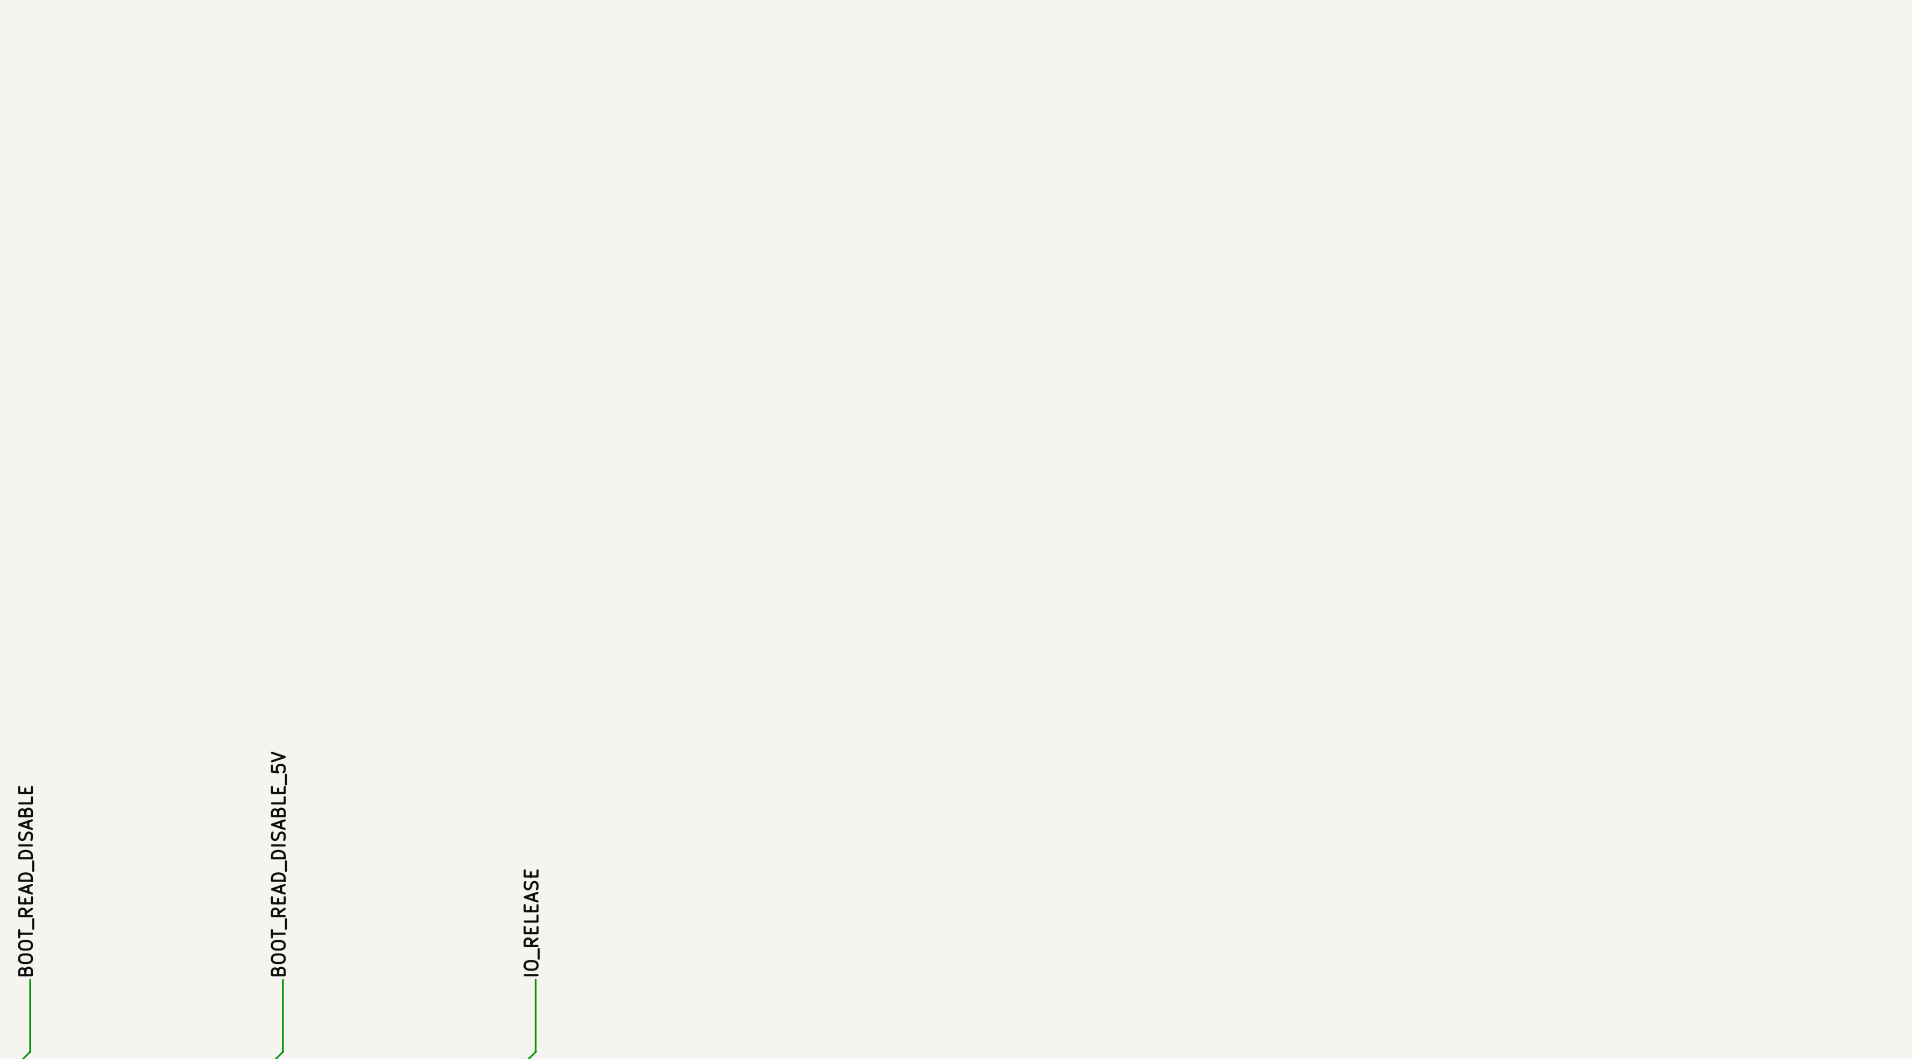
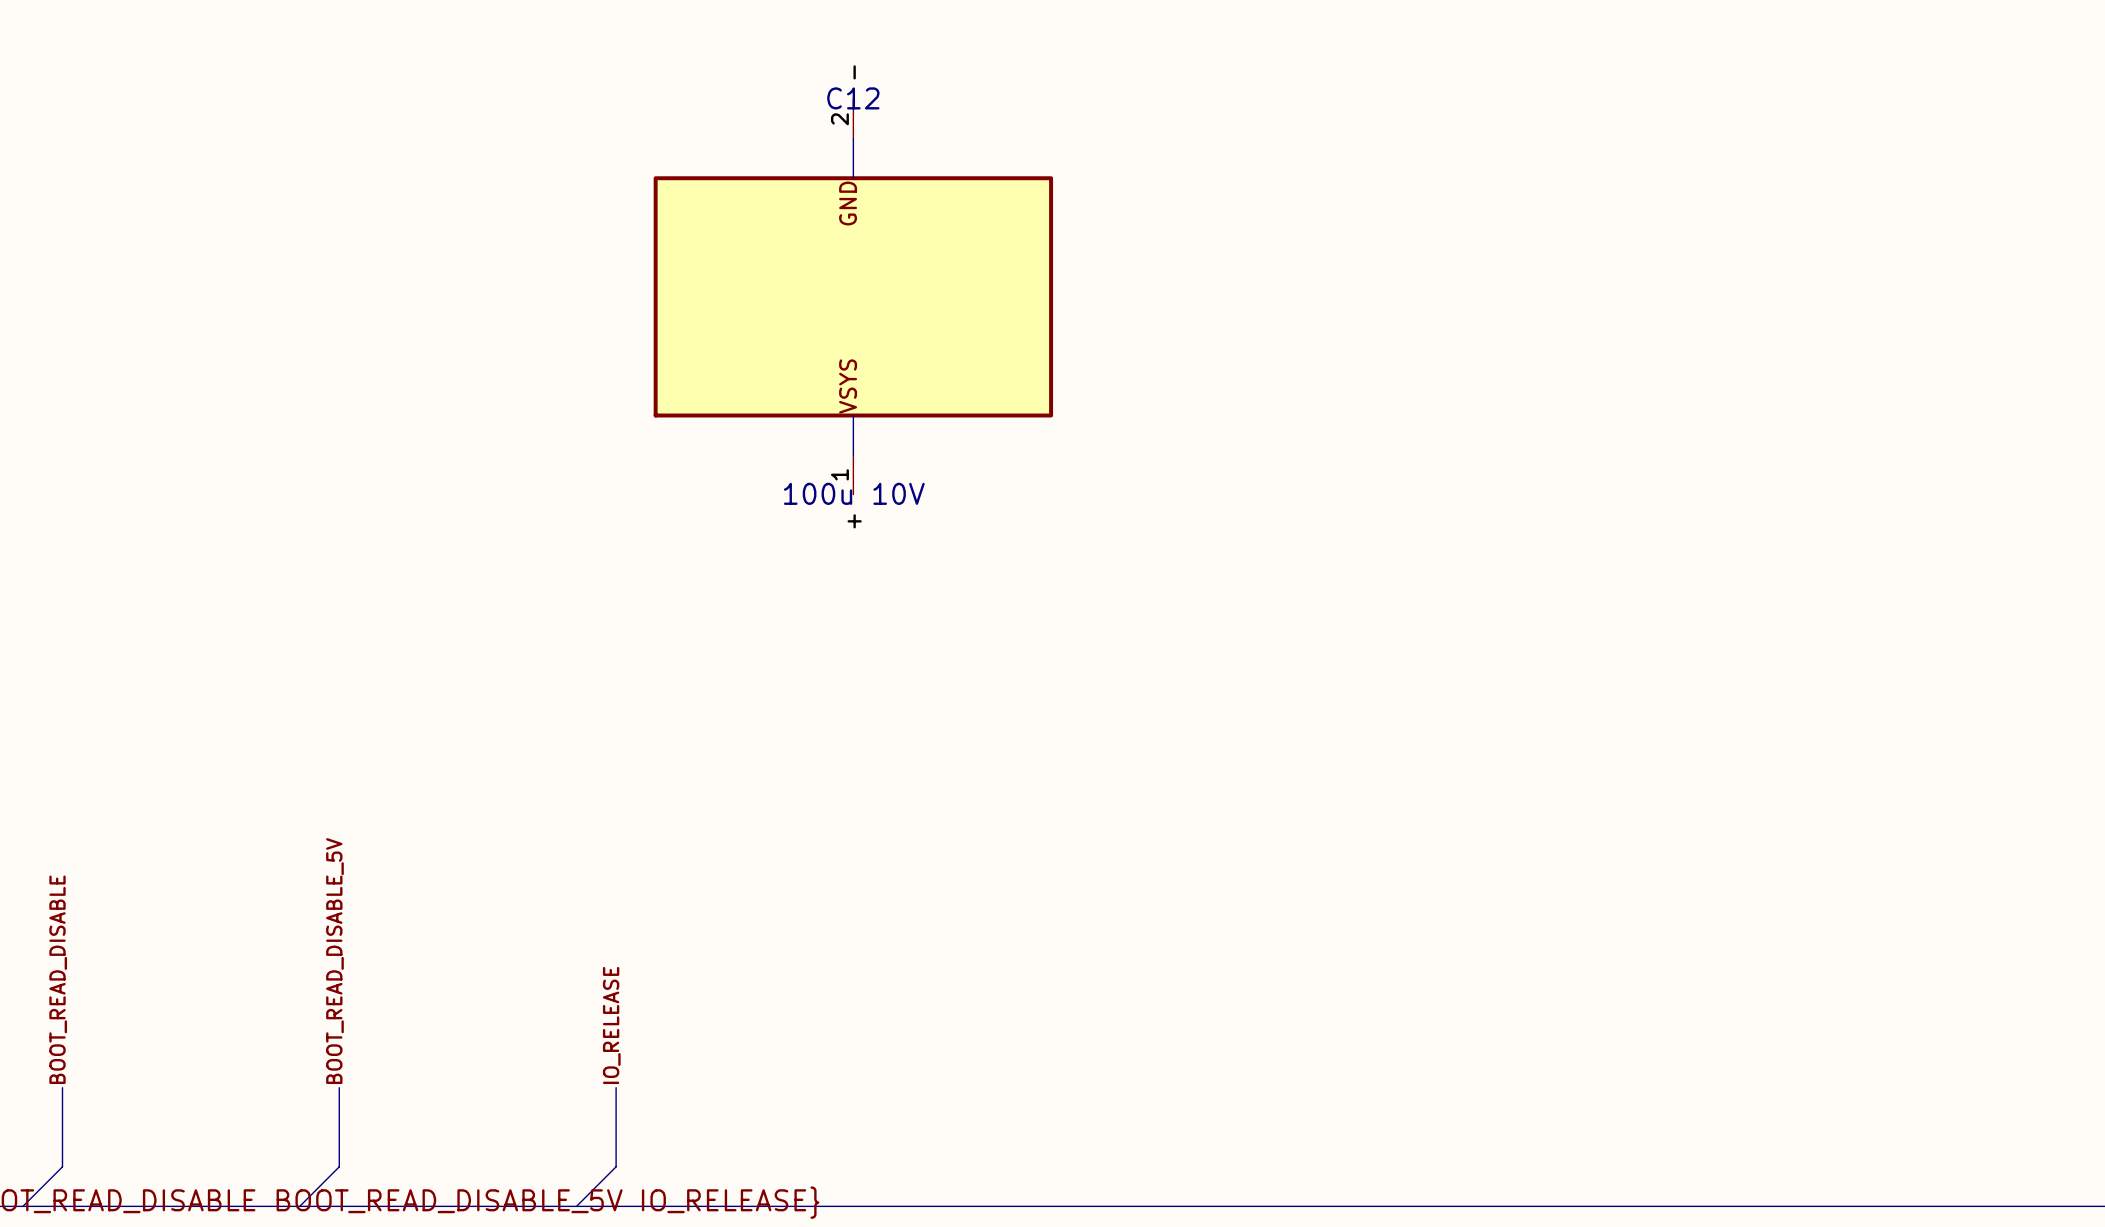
wire: none -> (853, 138) (853, 178)
label: none -> GND (848, 203)
C12: none -> 100u 10V (853, 296)
label: none -> VSYS (848, 386)
wire: none -> (853, 415) (853, 455)

